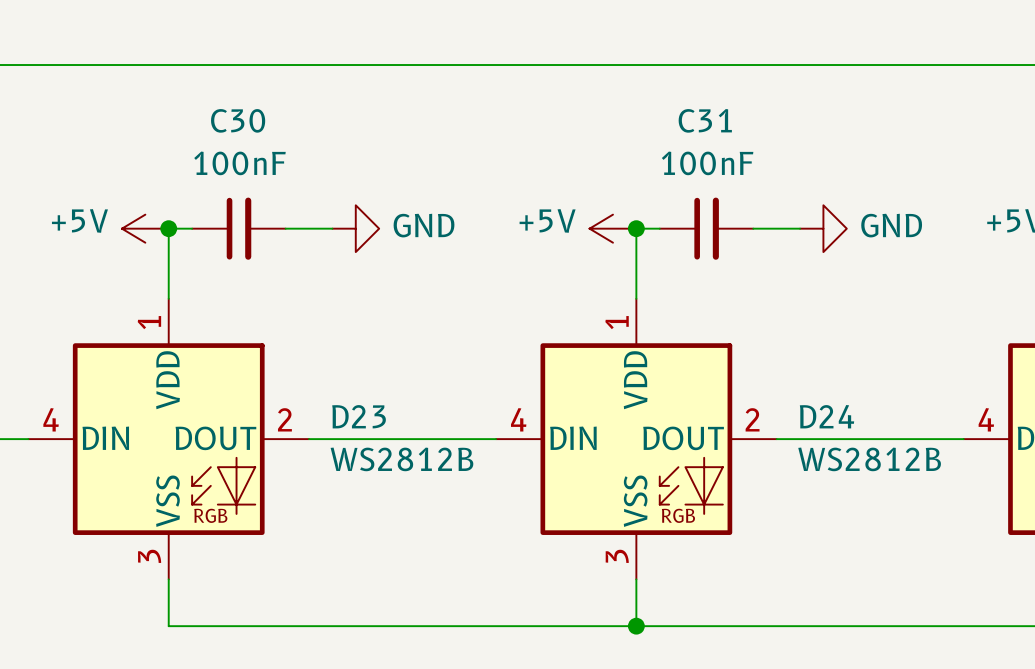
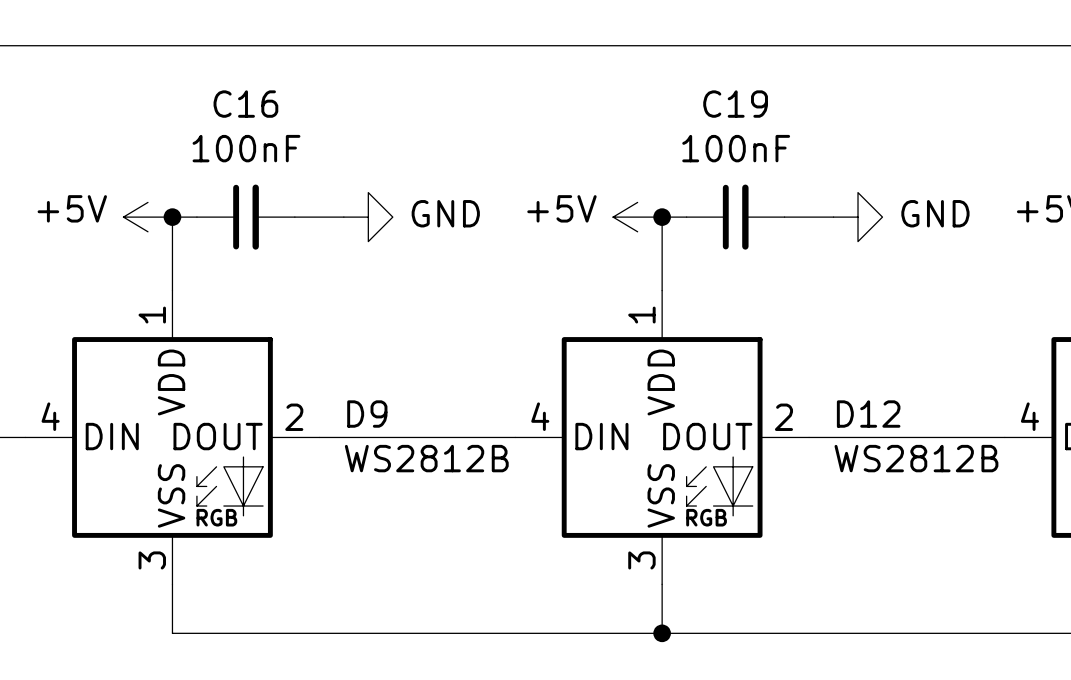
C30 name: C30 (238, 120) -> C16 (245, 104)
C31 name: C31 (705, 120) -> C19 (735, 104)
D23 name: D23 (359, 416) -> D9 (367, 414)
D24 name: D24 (826, 416) -> D12 (868, 414)

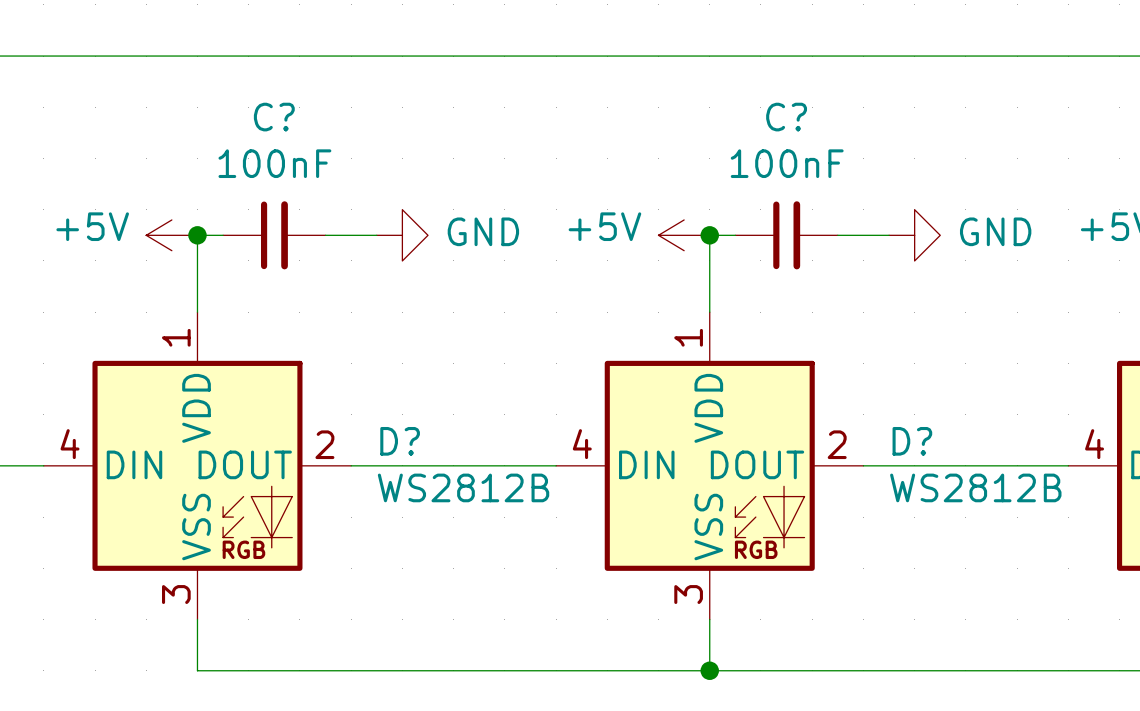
C16 name: C16 (245, 104) -> C? (274, 117)
C19 name: C19 (735, 104) -> C? (786, 117)
D9 name: D9 (367, 414) -> D? (400, 441)
D12 name: D12 (868, 414) -> D? (912, 441)

